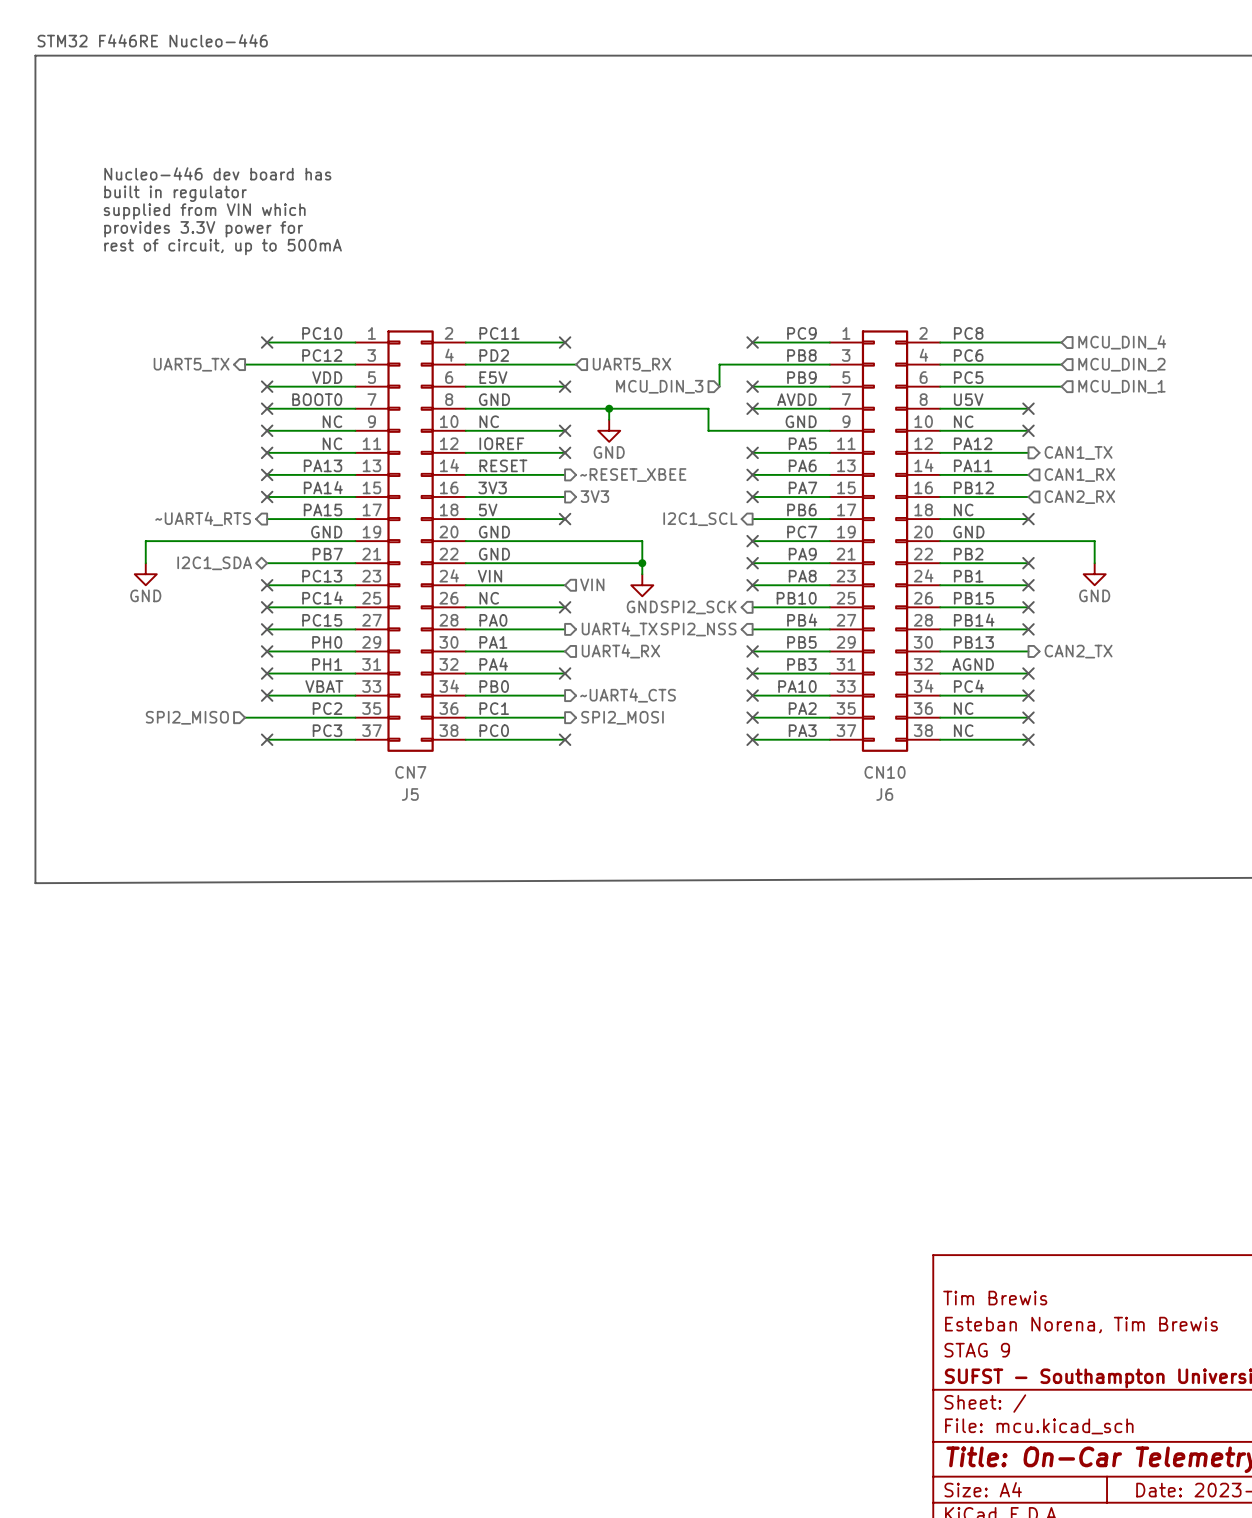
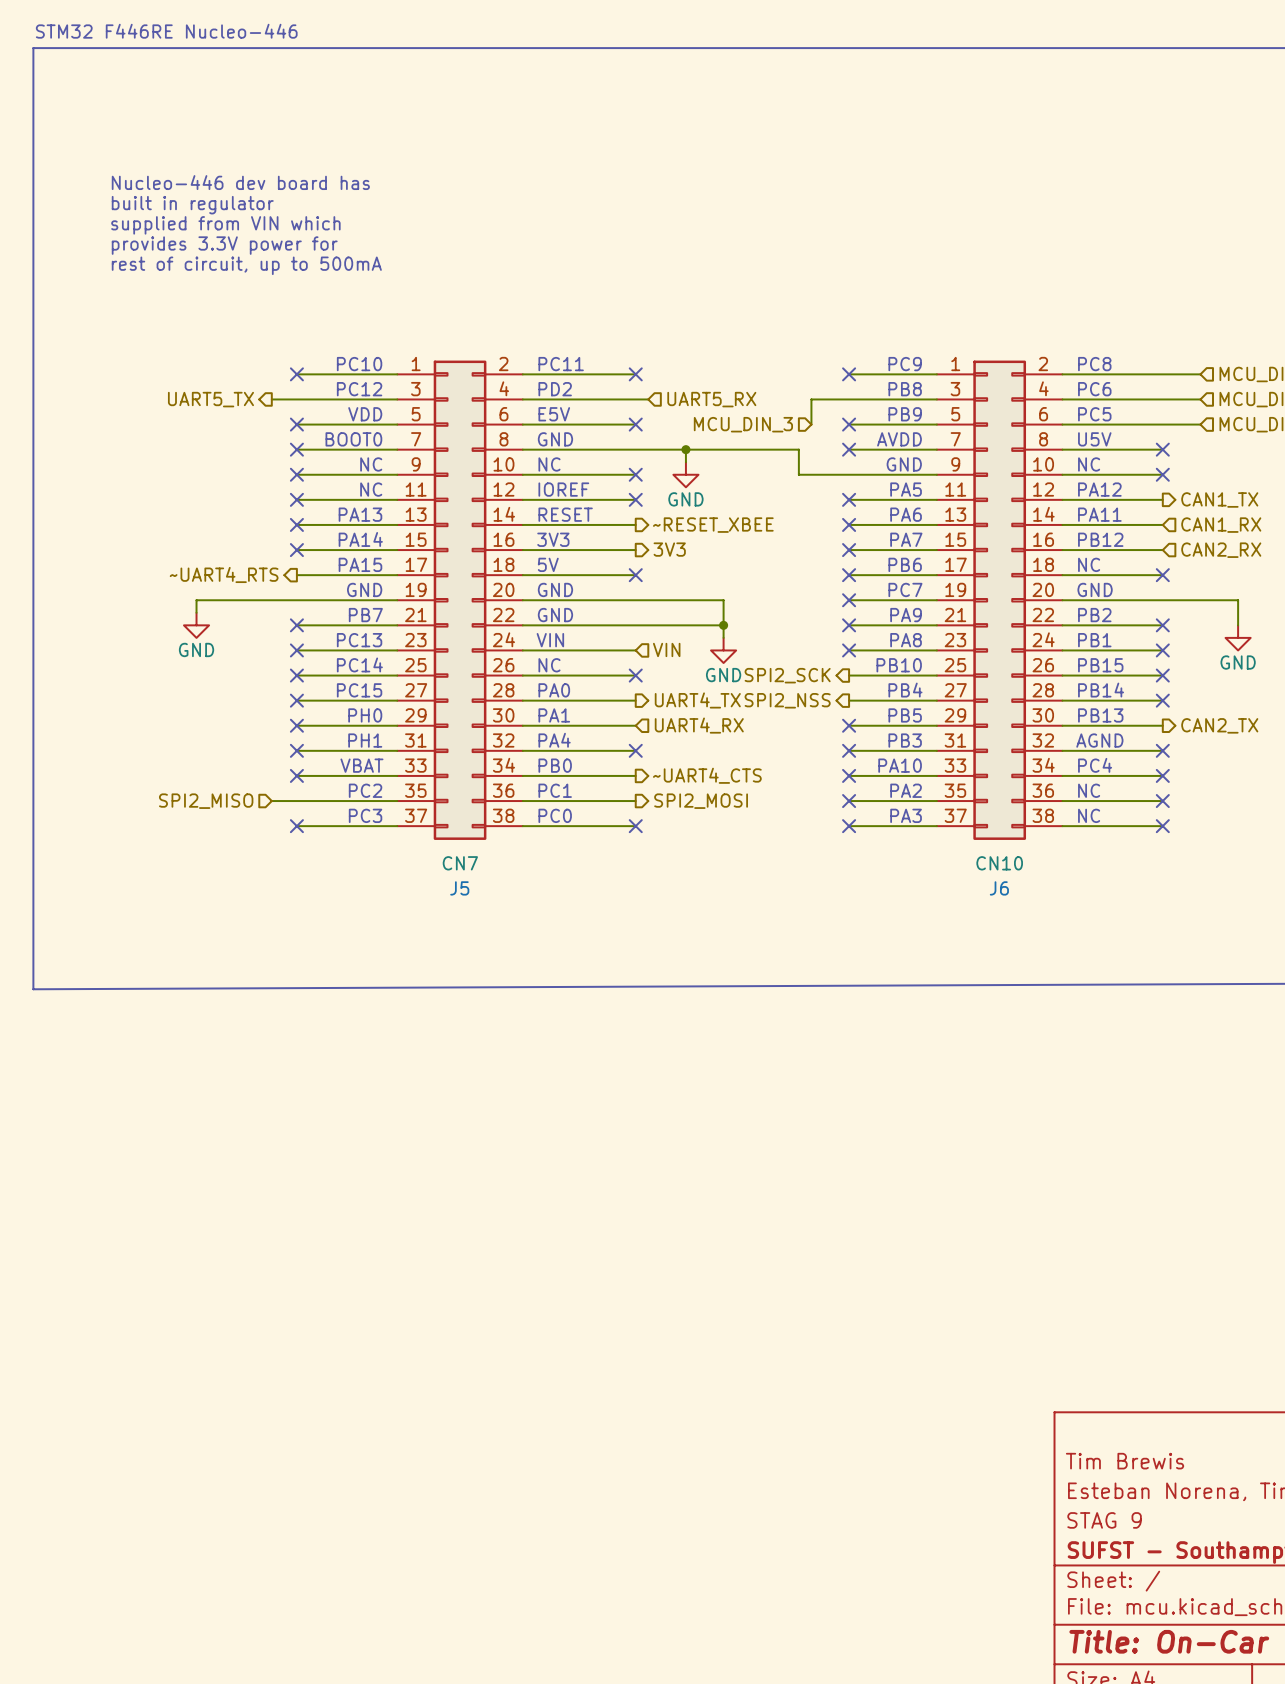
hierarchical label: I2C1_SCL (700, 519) -> none
no-connect mark: none -> (849, 575)
wire: (178, 541) (145, 541) (145, 563) -> (196, 600) (196, 612)
hierarchical label: I2C1_SDA (214, 563) -> none
no-connect mark: none -> (296, 625)
power symbol position: GND (145, 574) -> GND (196, 625)

